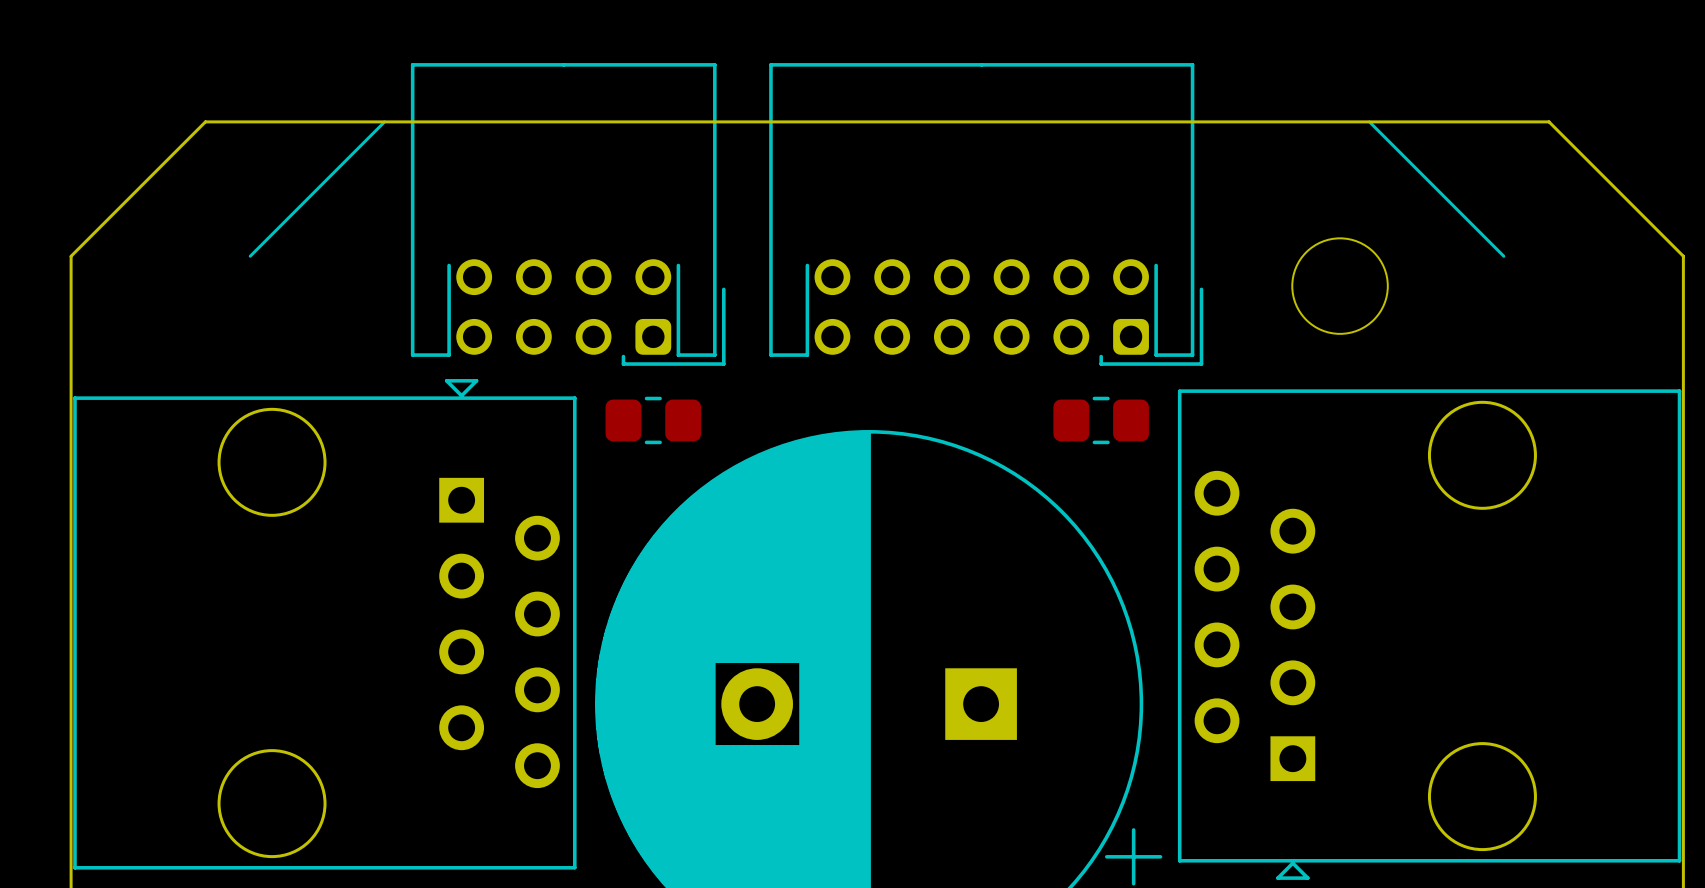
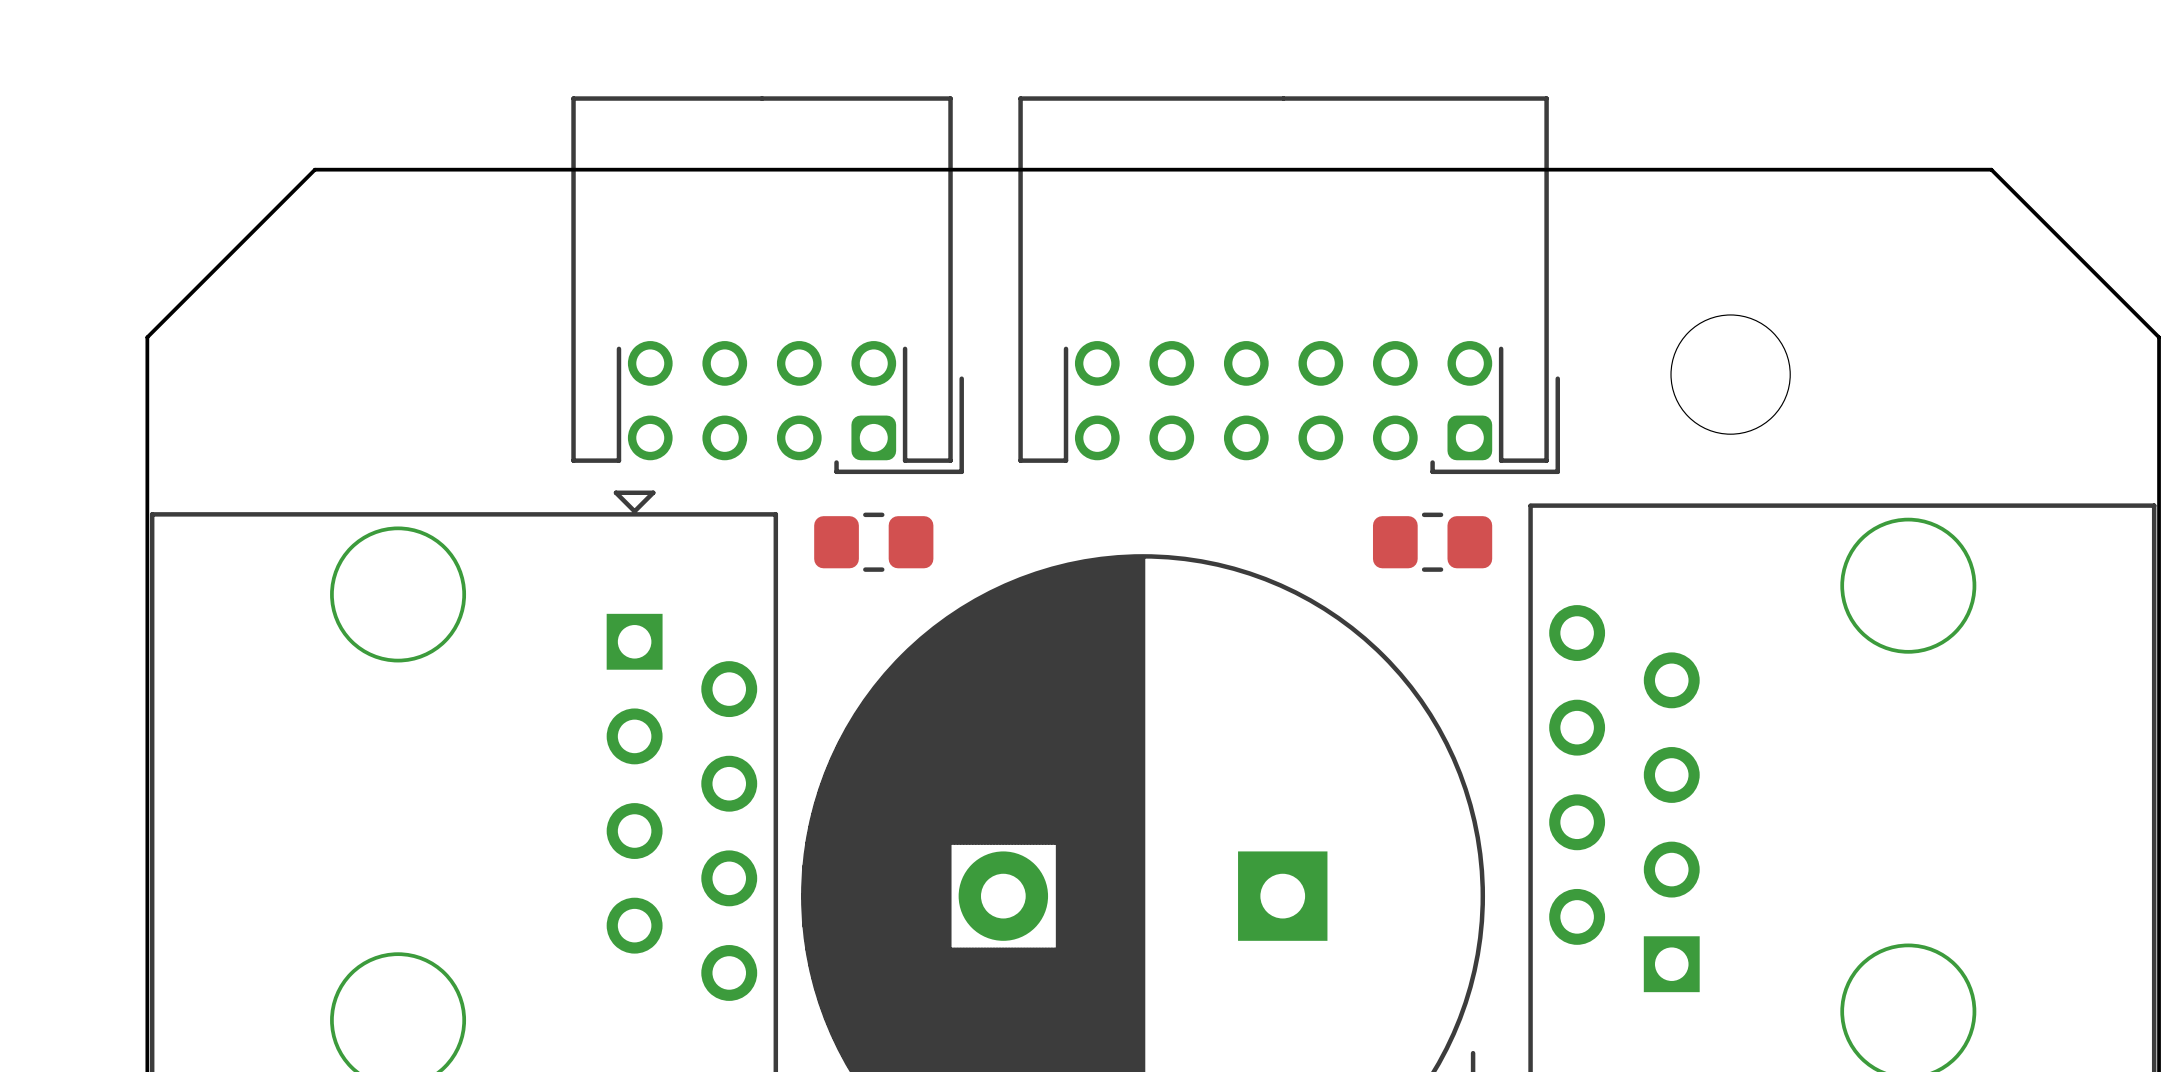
line: (384, 121) (250, 256) -> none
line: (1369, 121) (1503, 256) -> none

